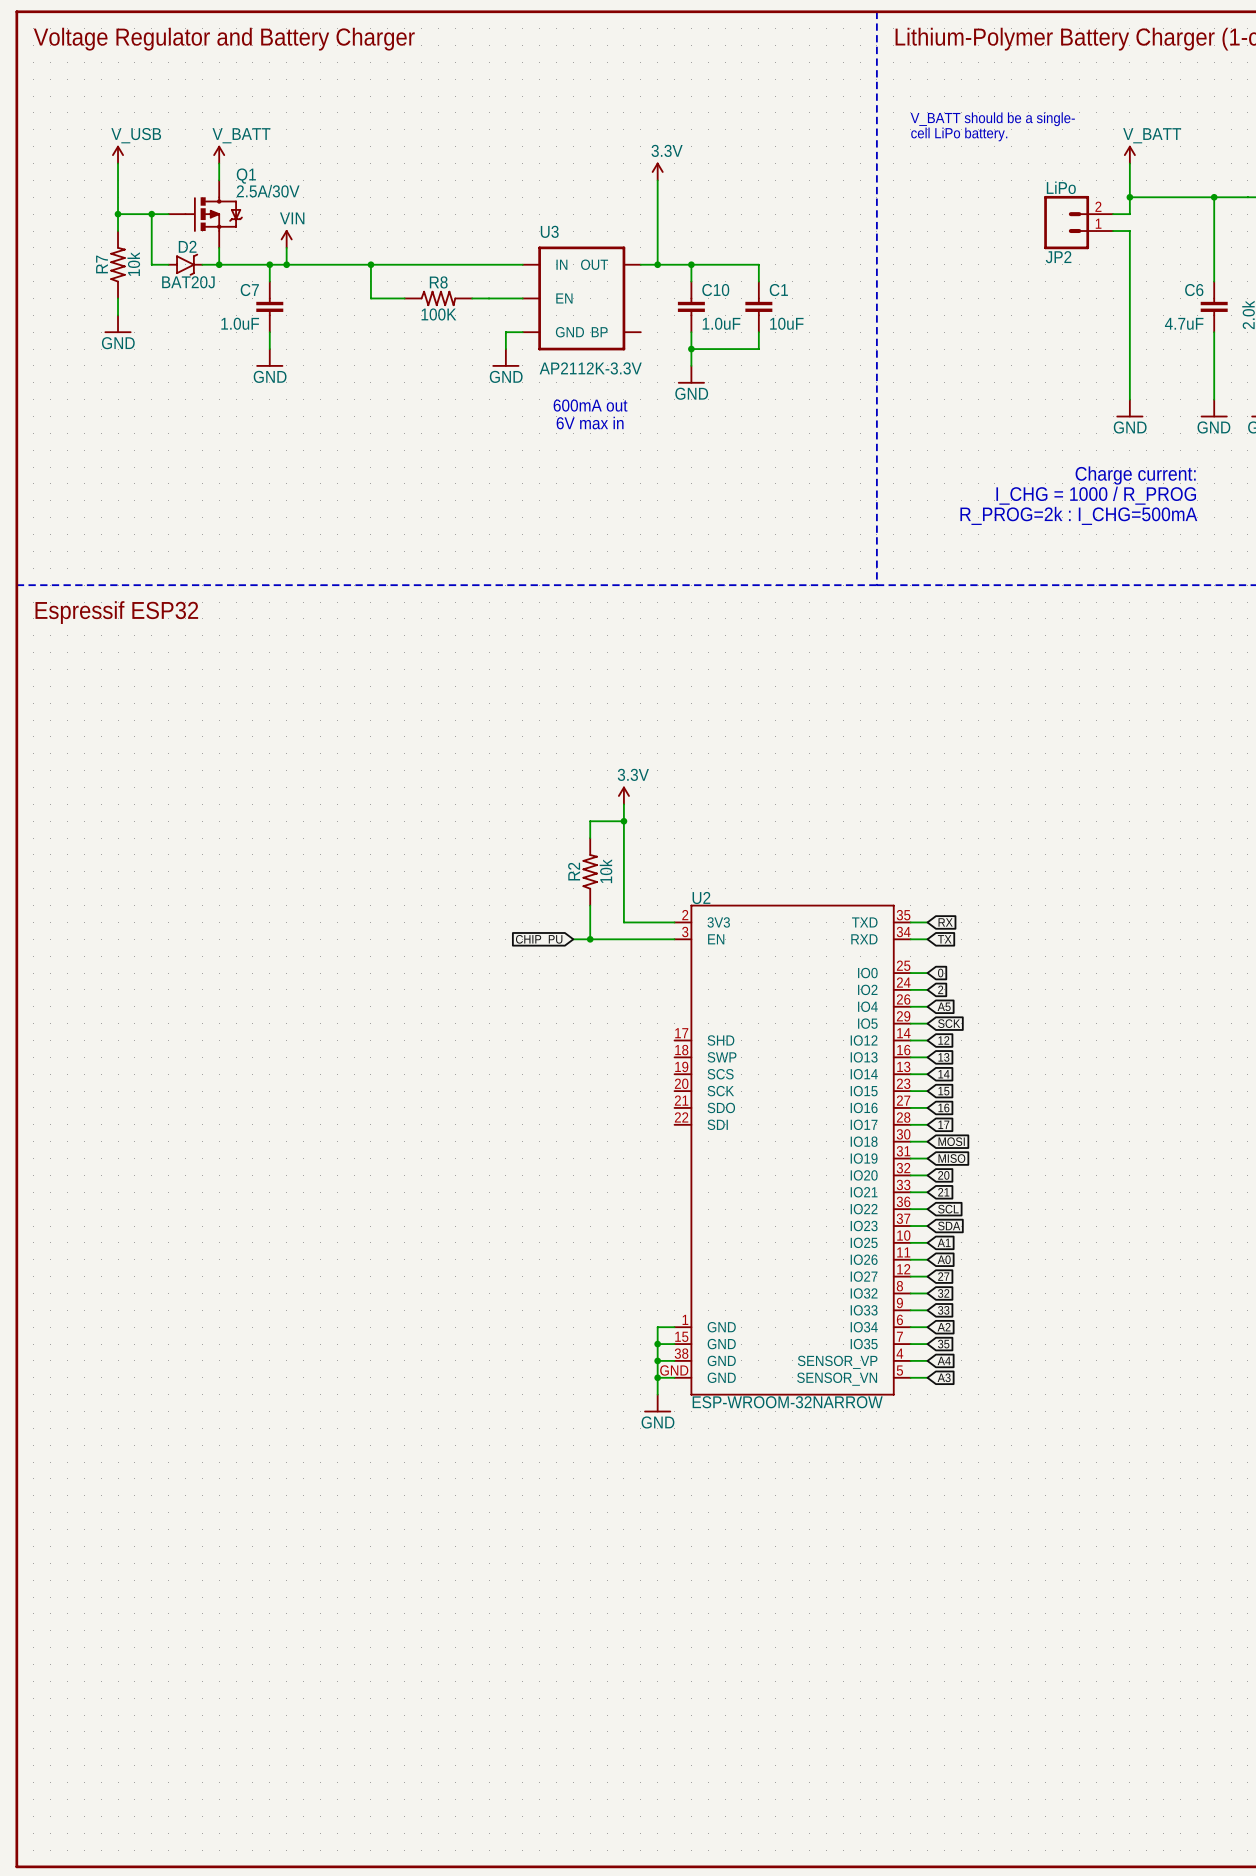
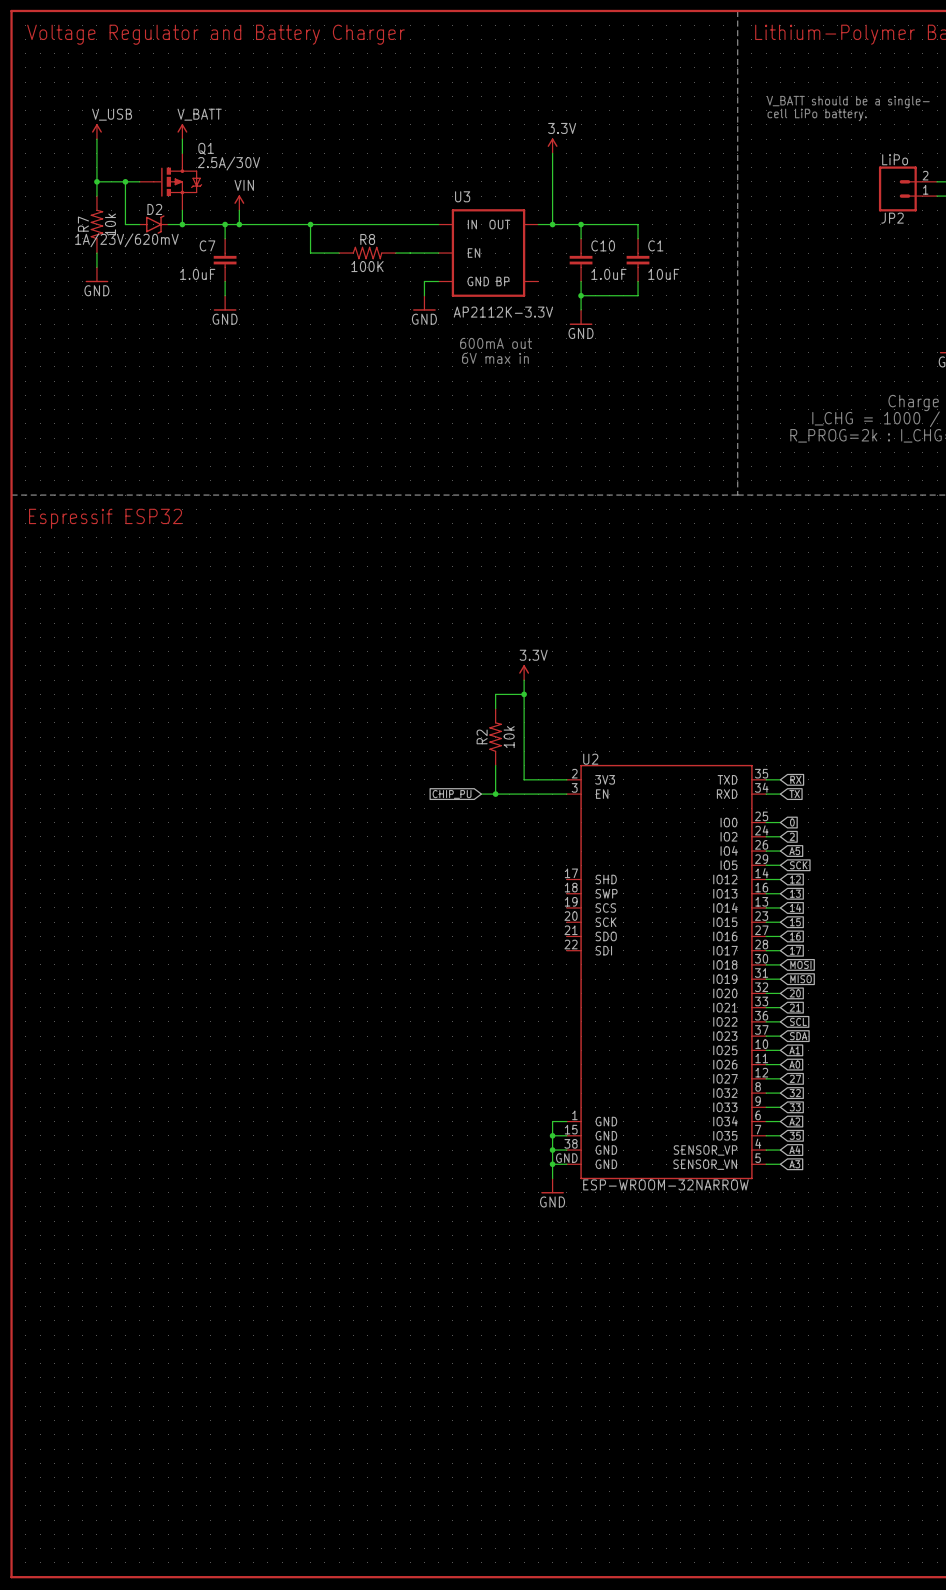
D2 value: BAT20J (188, 282) -> 1A/23V/620mV (126, 240)

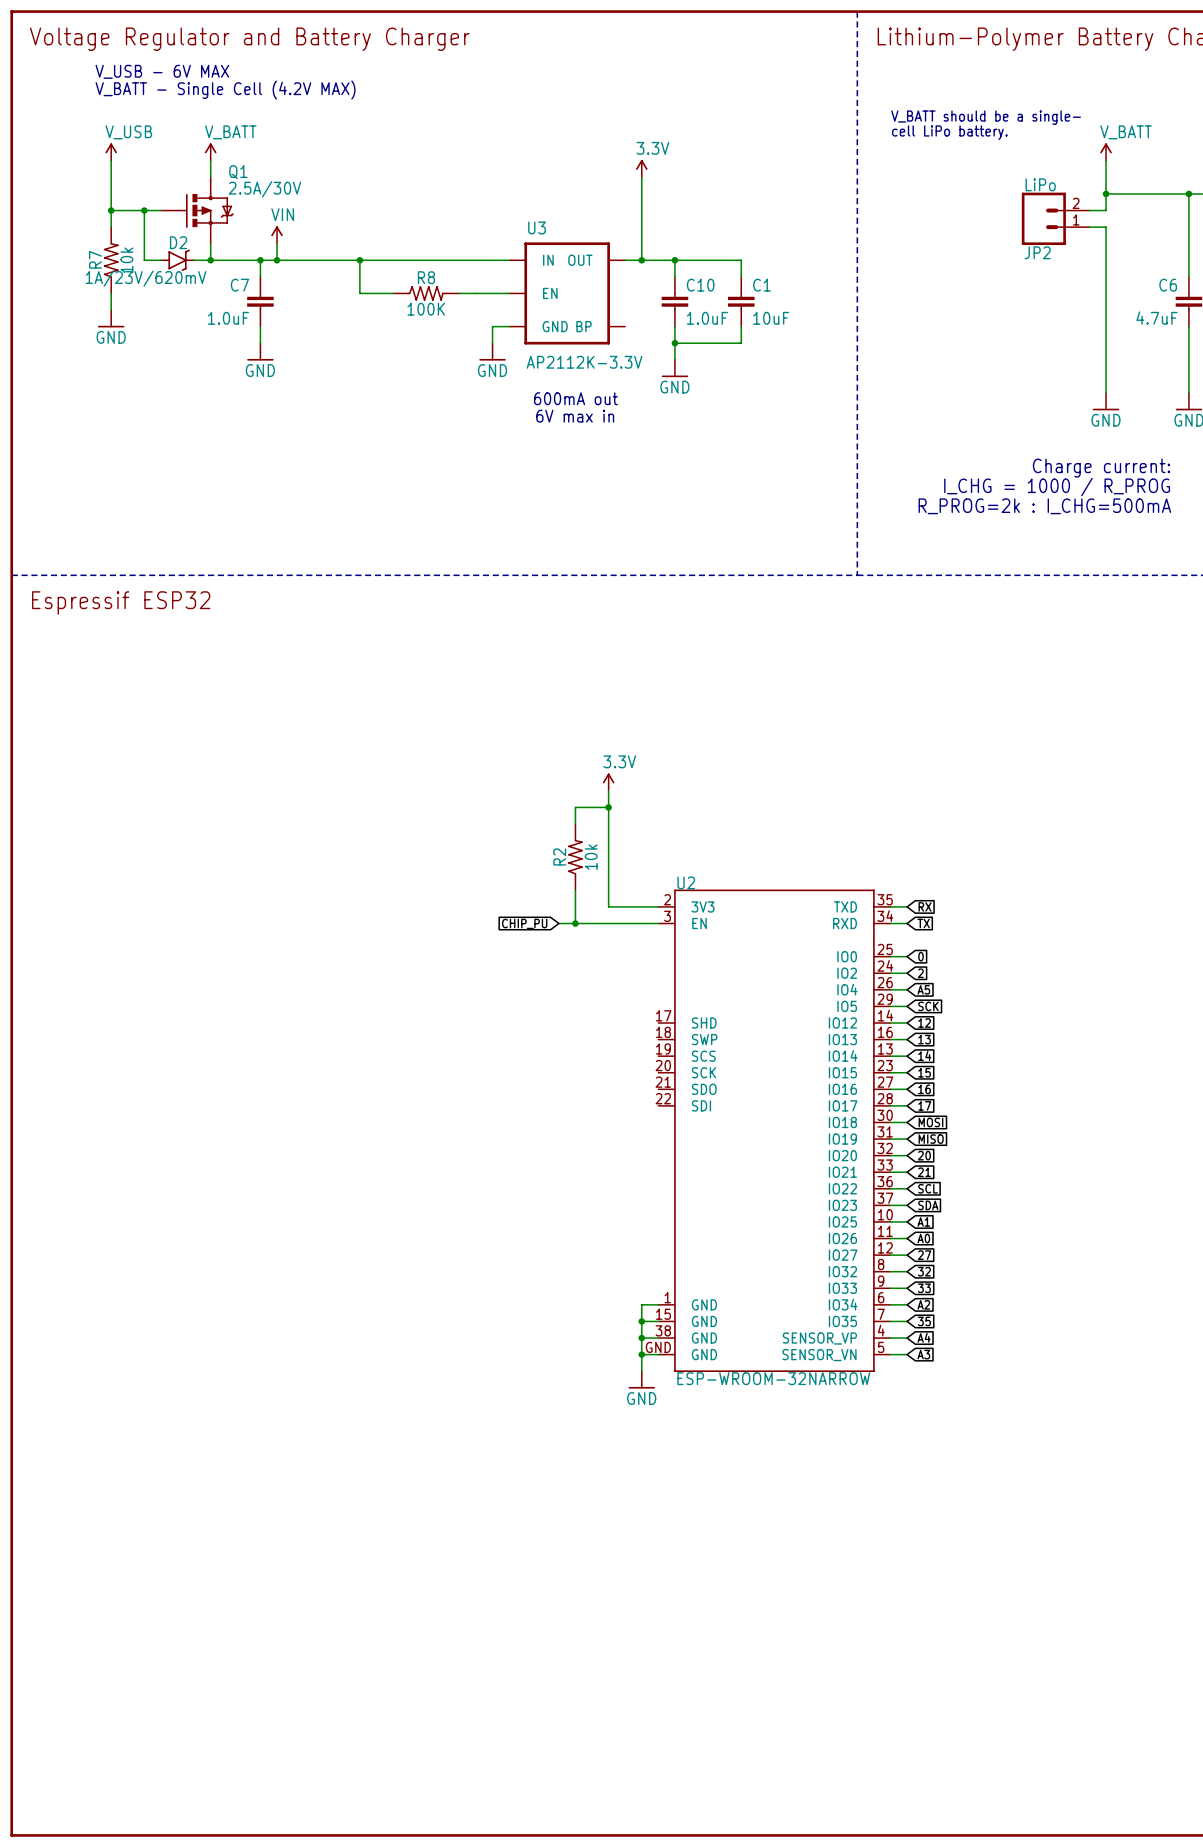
text: none -> V_USB - 6V MAX (162, 71)
text: none -> V_BATT - Single Cell (4.2V MAX) (225, 90)

